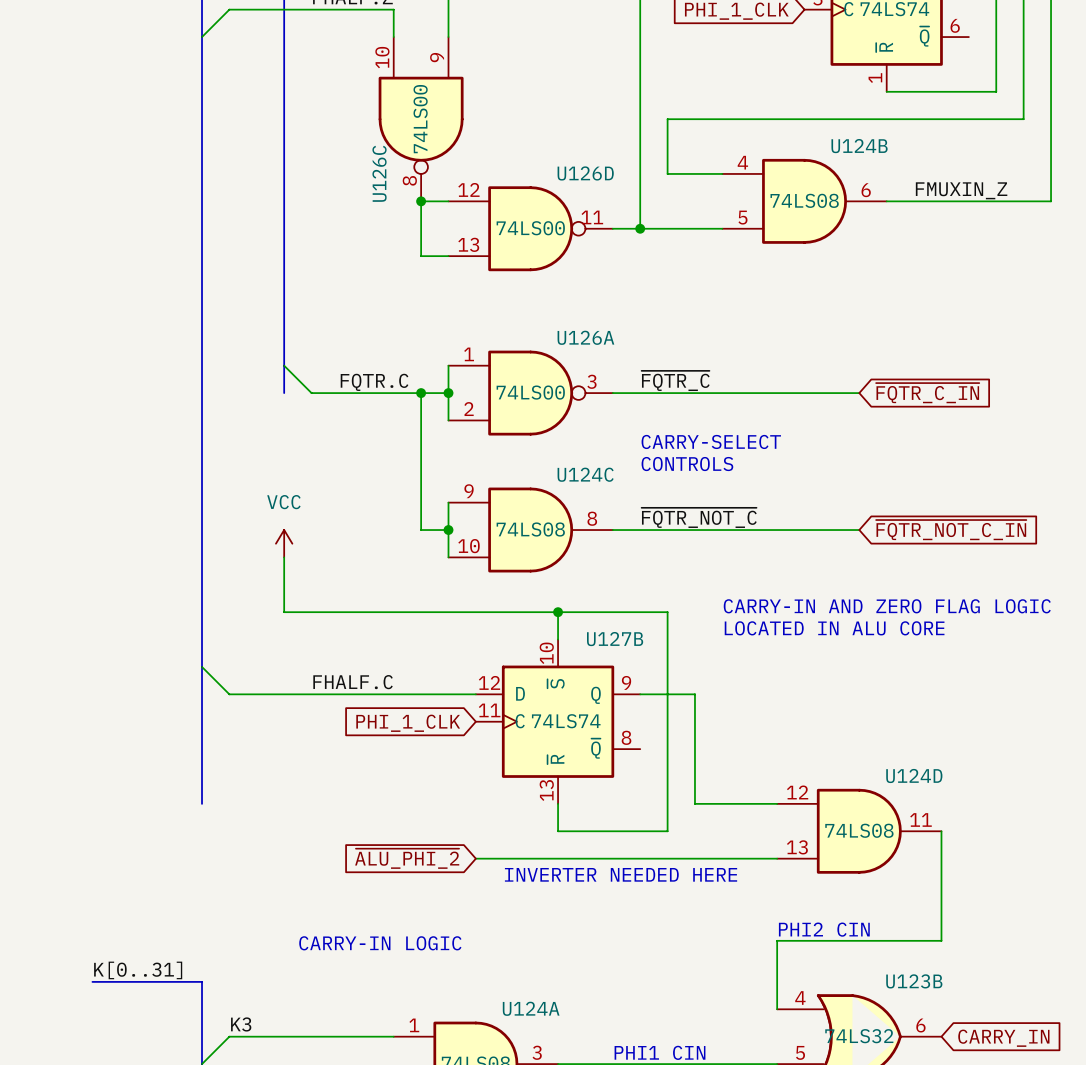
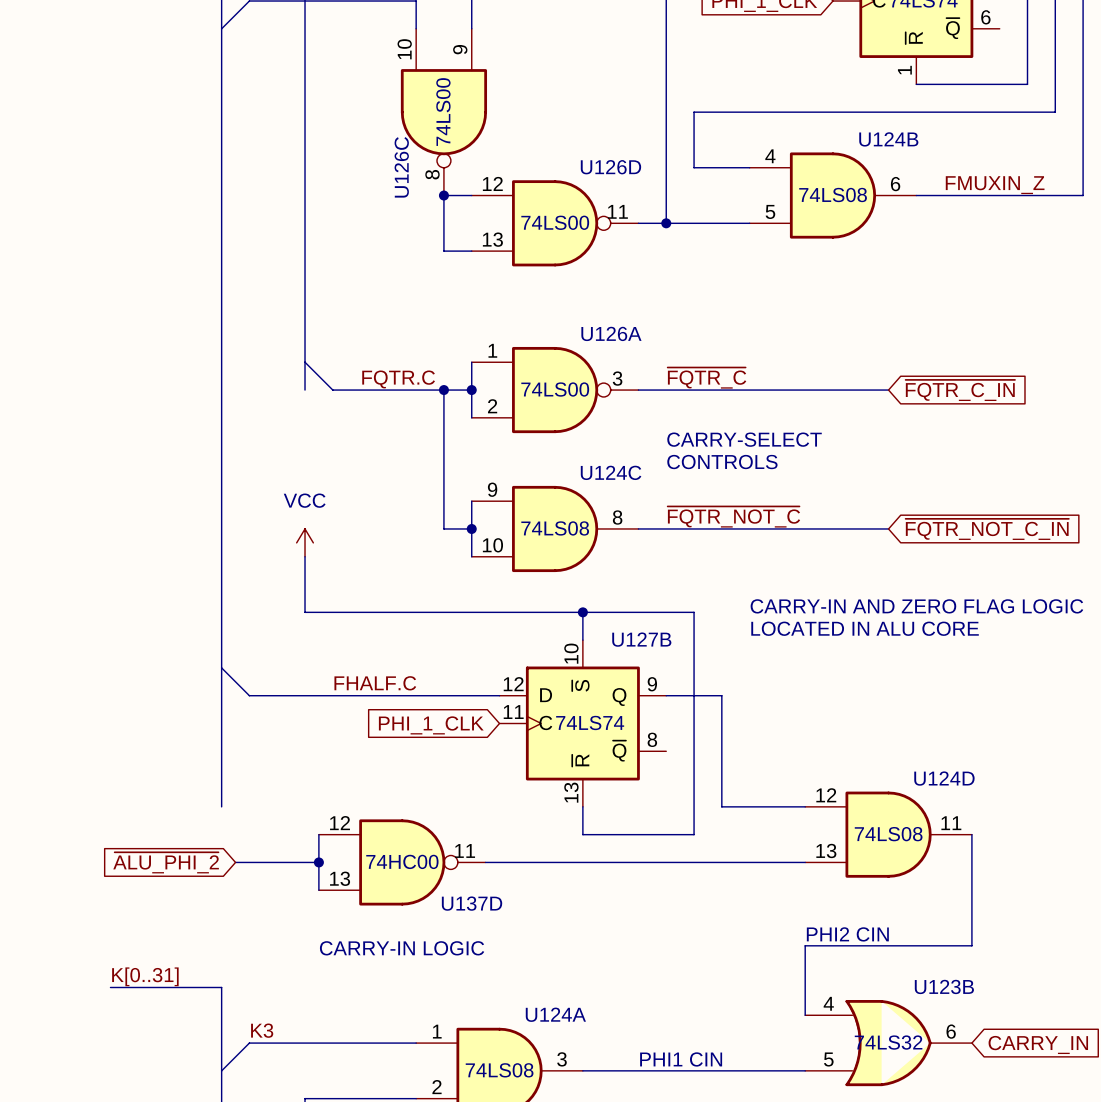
wire: none -> (318, 834) (318, 890)
wire: none -> (235, 862) (318, 862)
junction: none -> (318, 862)
U137D: none -> 74HC00 (402, 862)
global label position: ~{ALU_PHI_2} (407, 858) -> ~{ALU_PHI_2} (166, 862)
wire: none -> (485, 862) (499, 862)
text: INVERTER NEEDED HERE (621, 874) -> none

